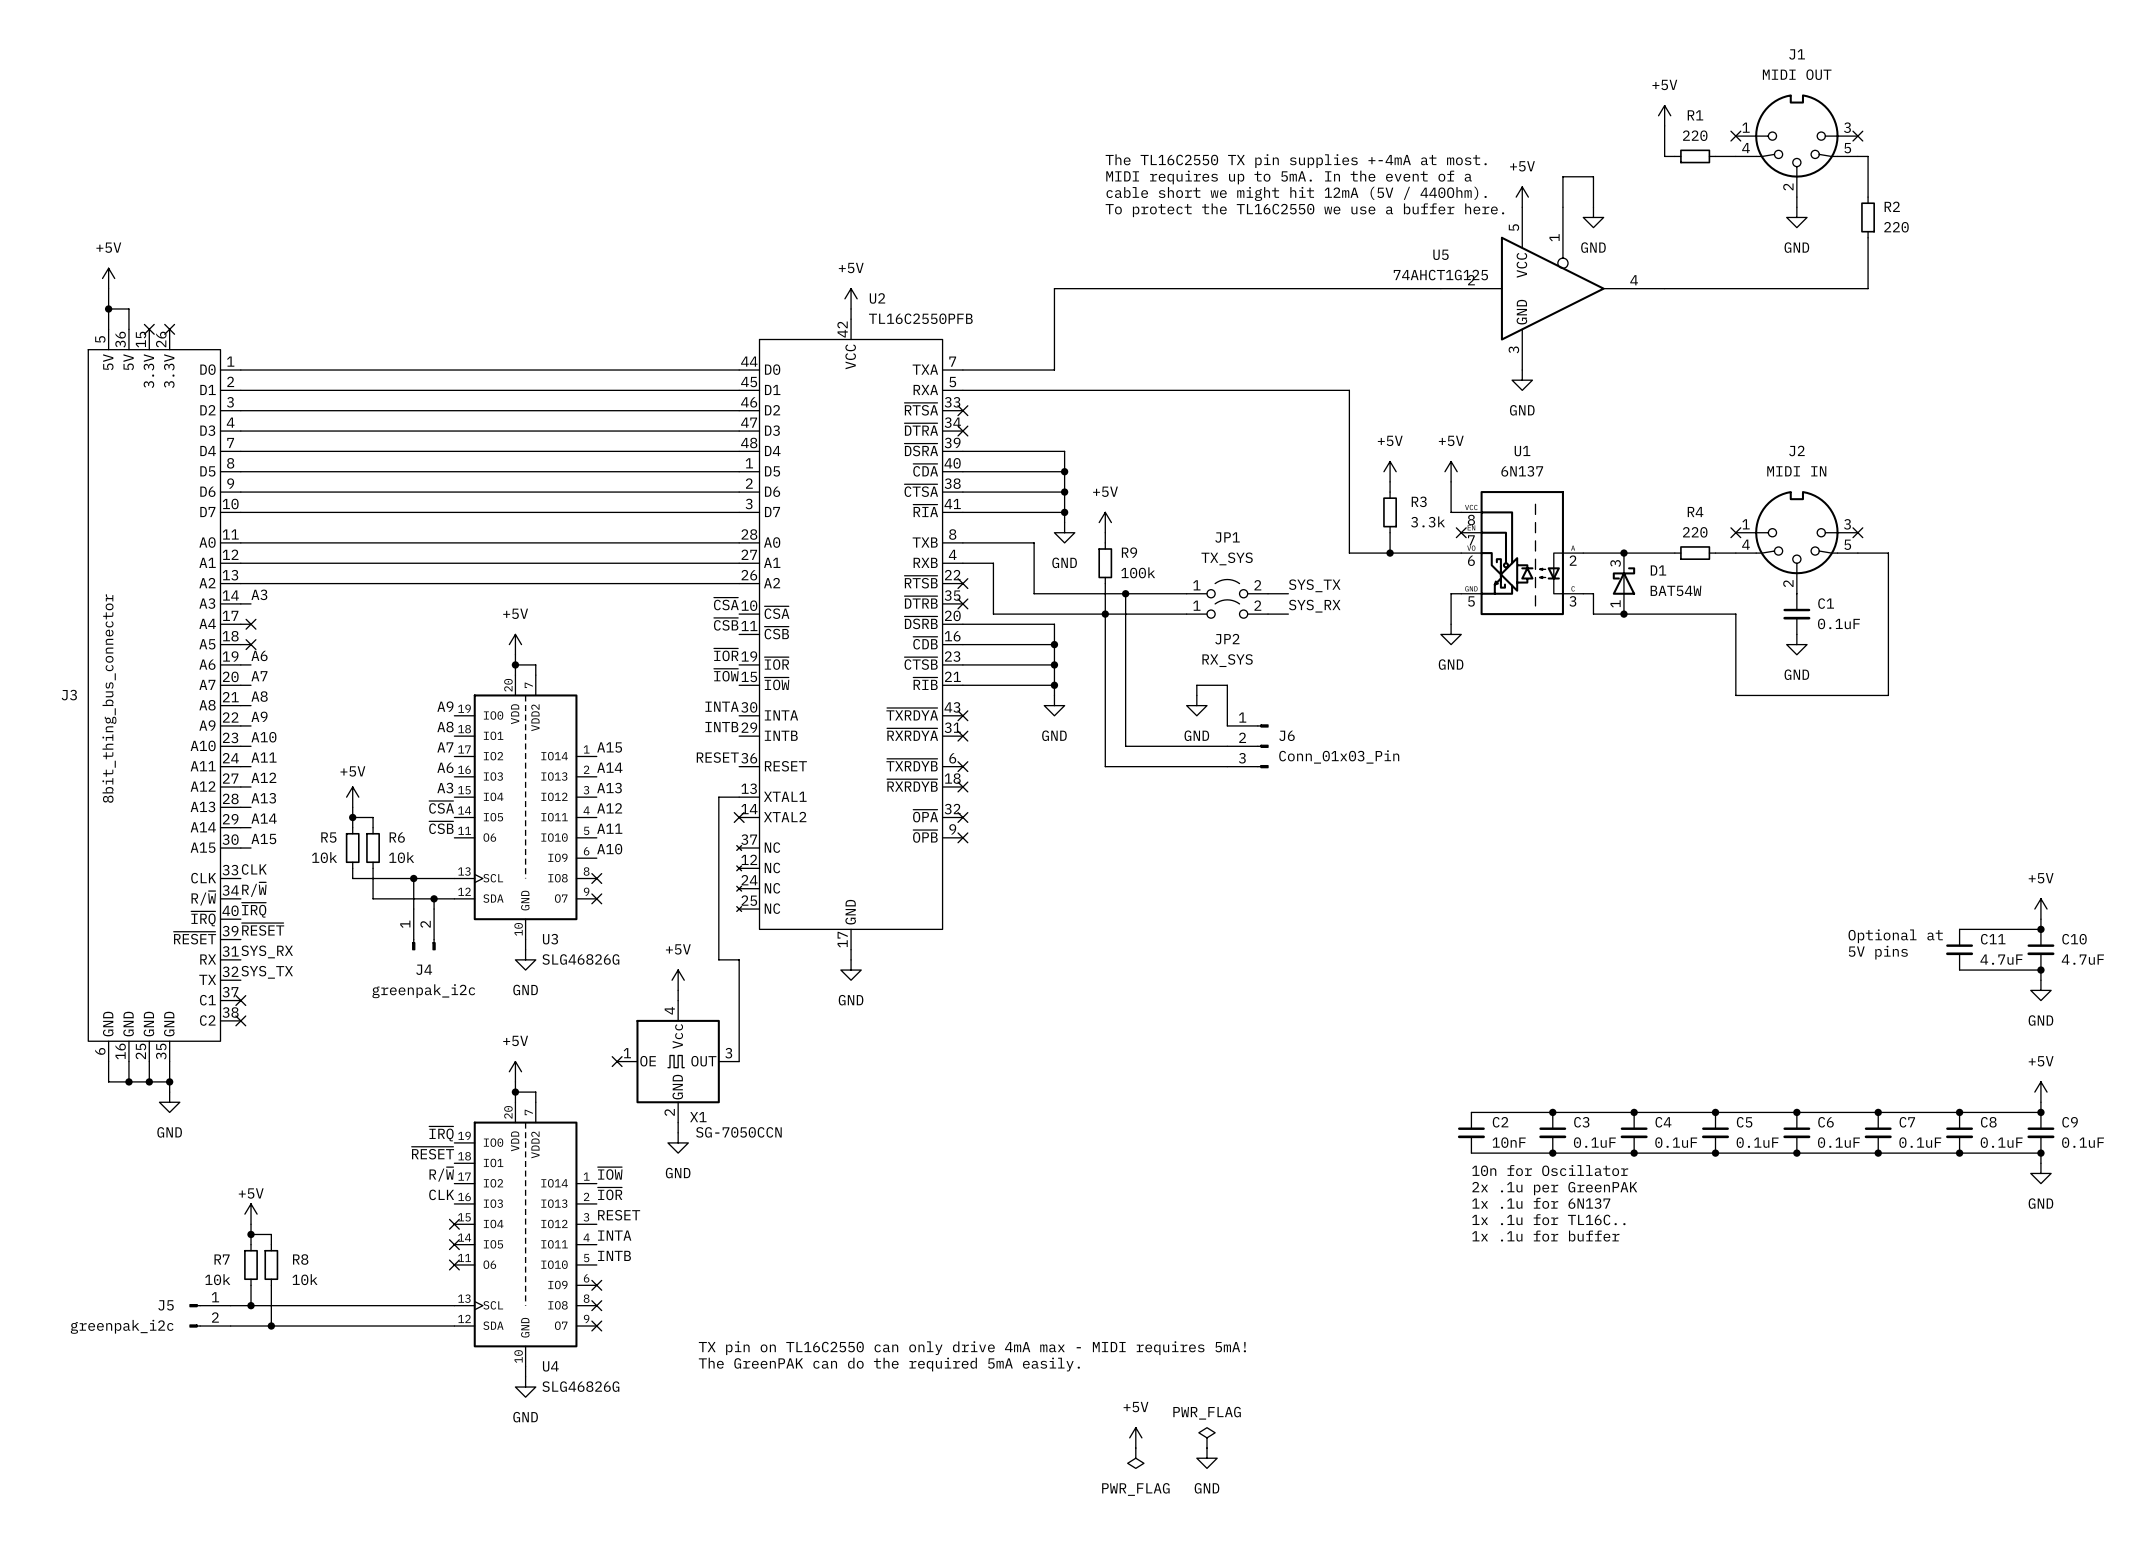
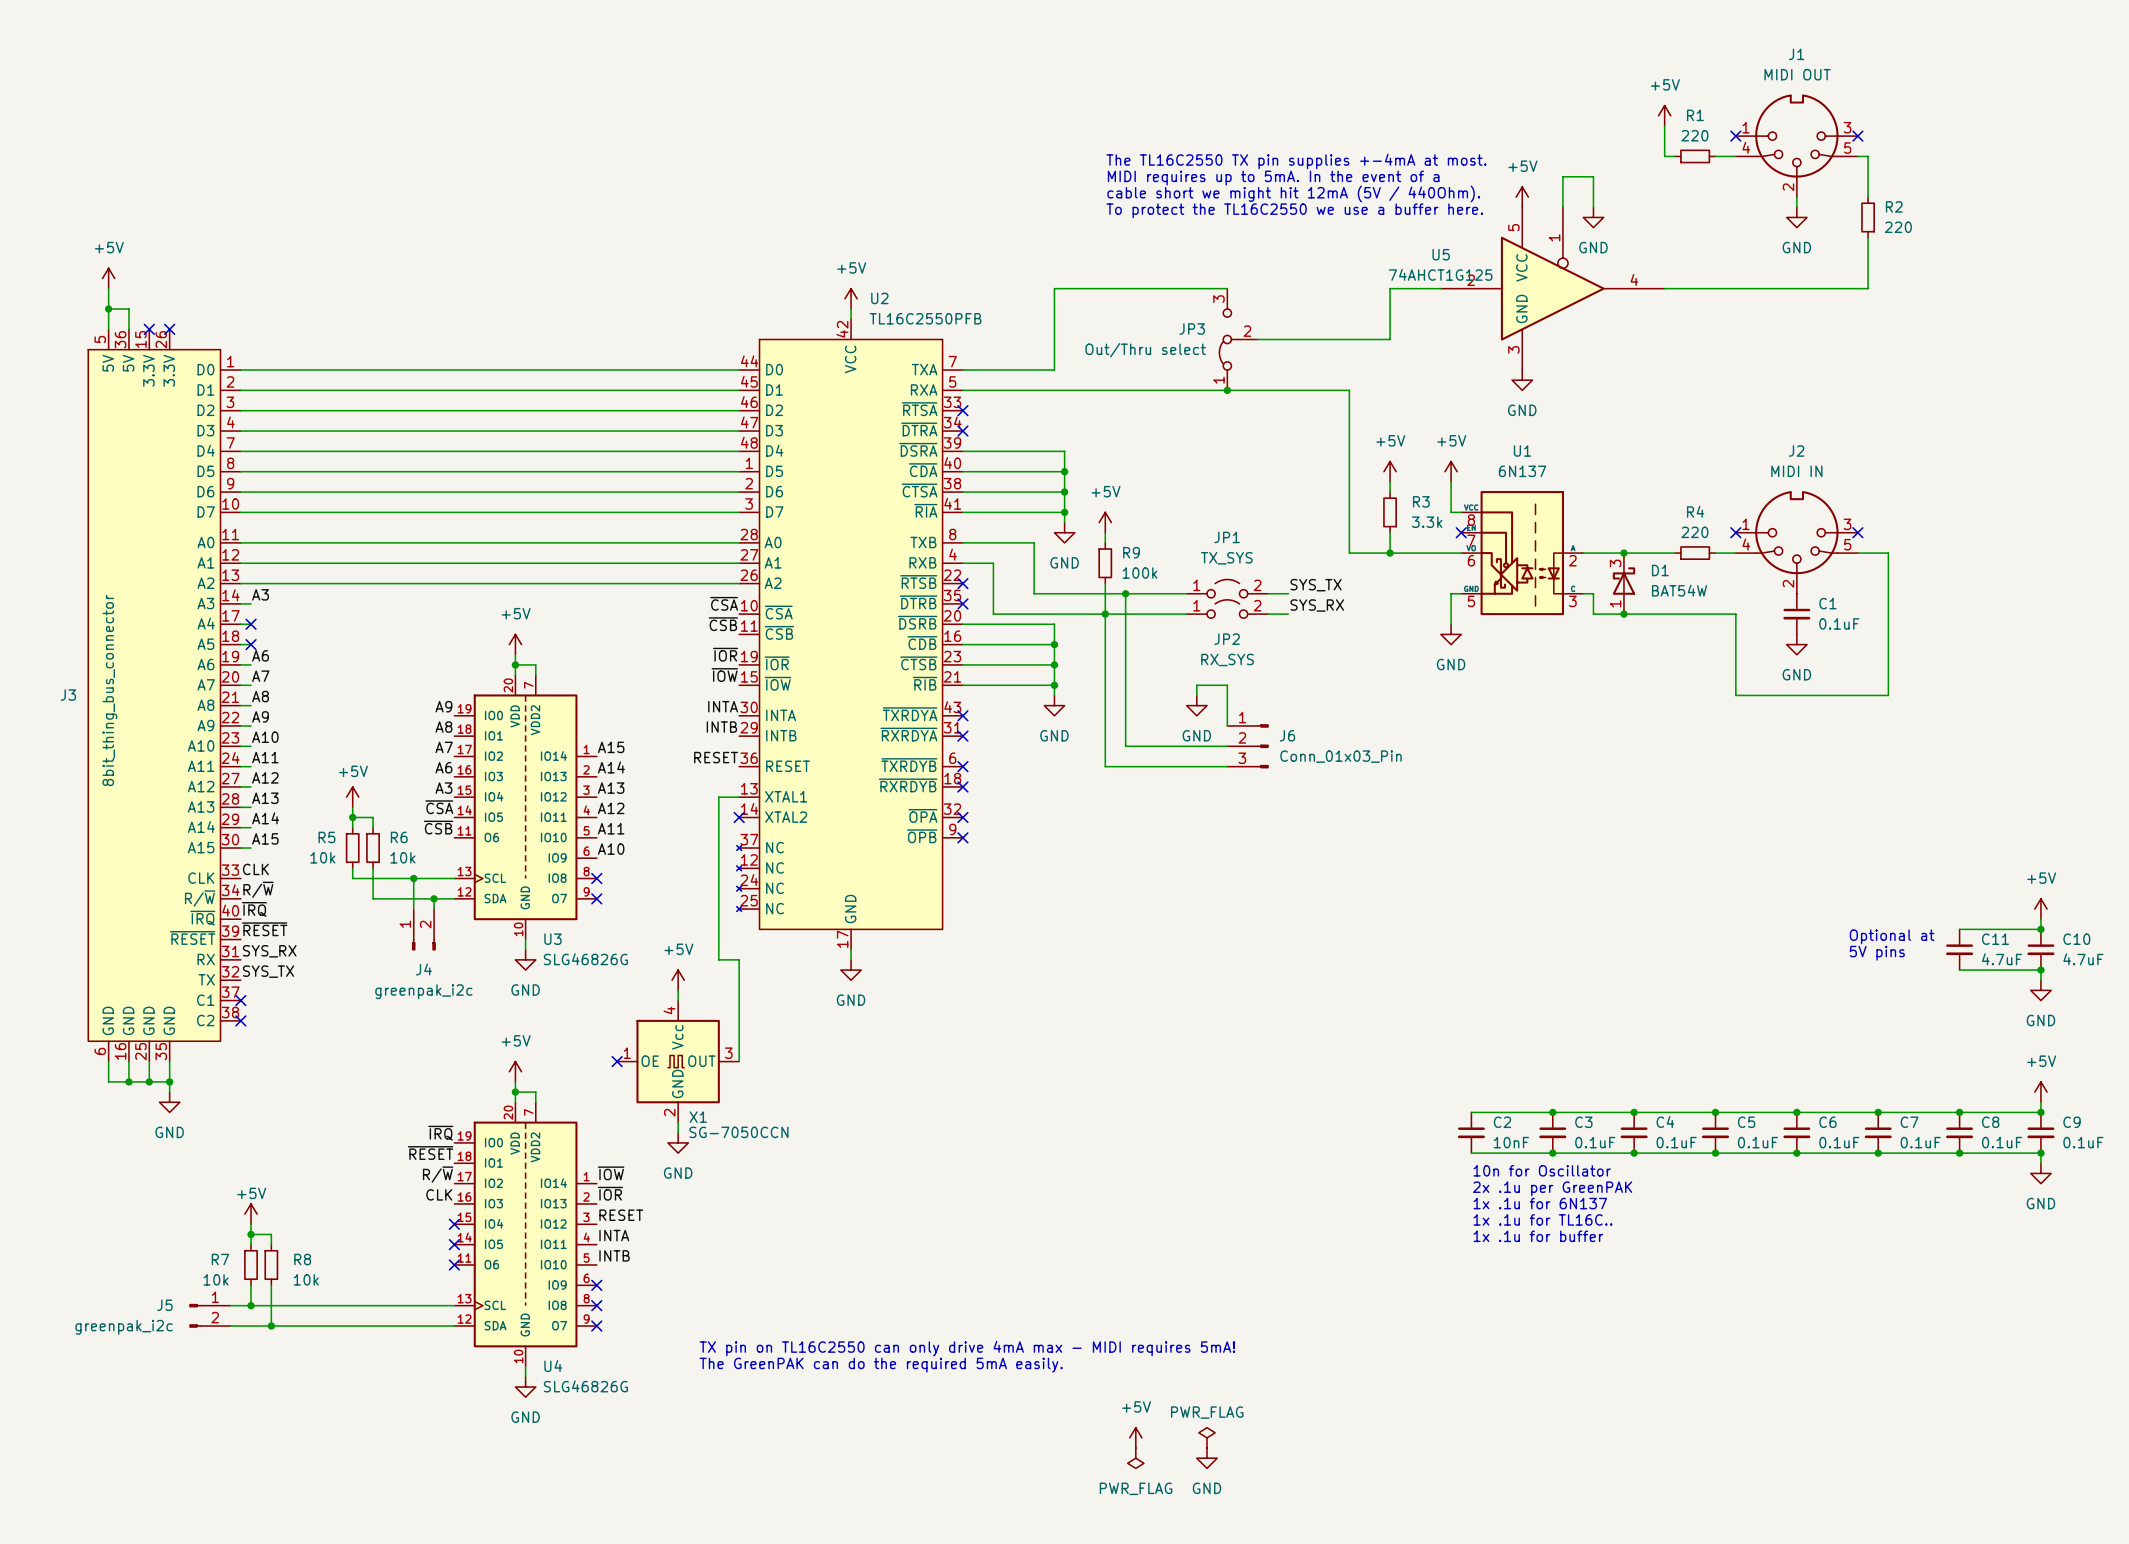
wire: (1227, 288) (1390, 288) -> (1257, 339) (1390, 339) (1390, 288)
JP3: none -> Out/Thru select (1238, 339)
junction: none -> (1227, 390)

